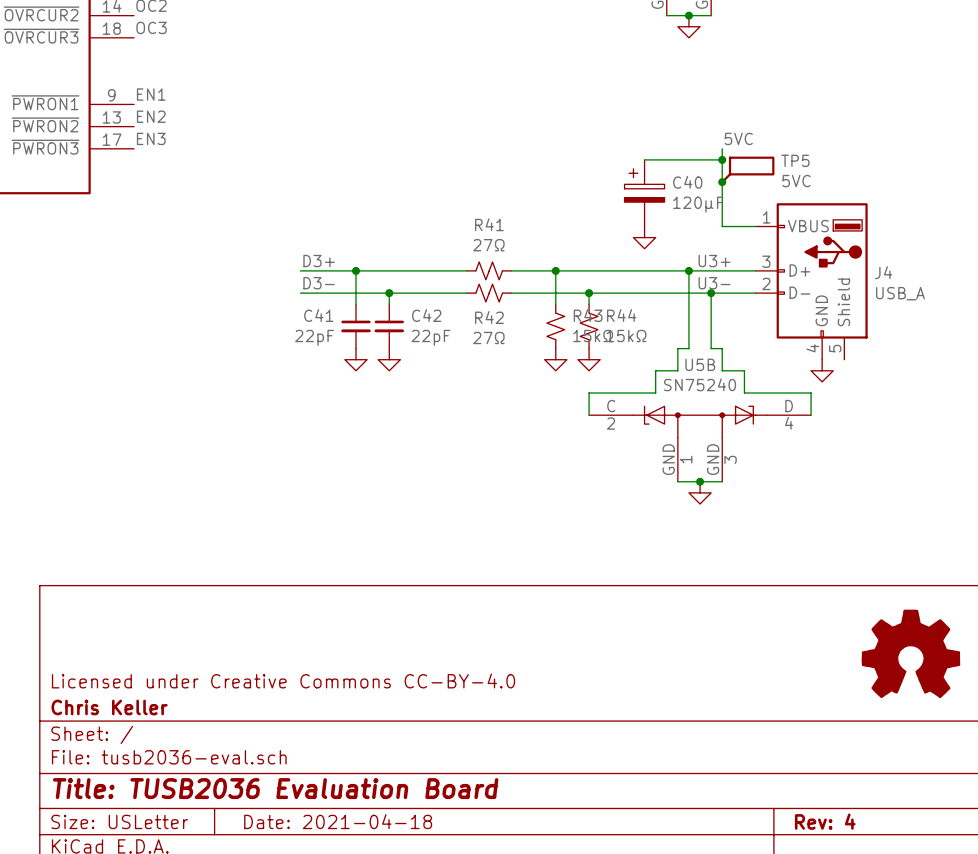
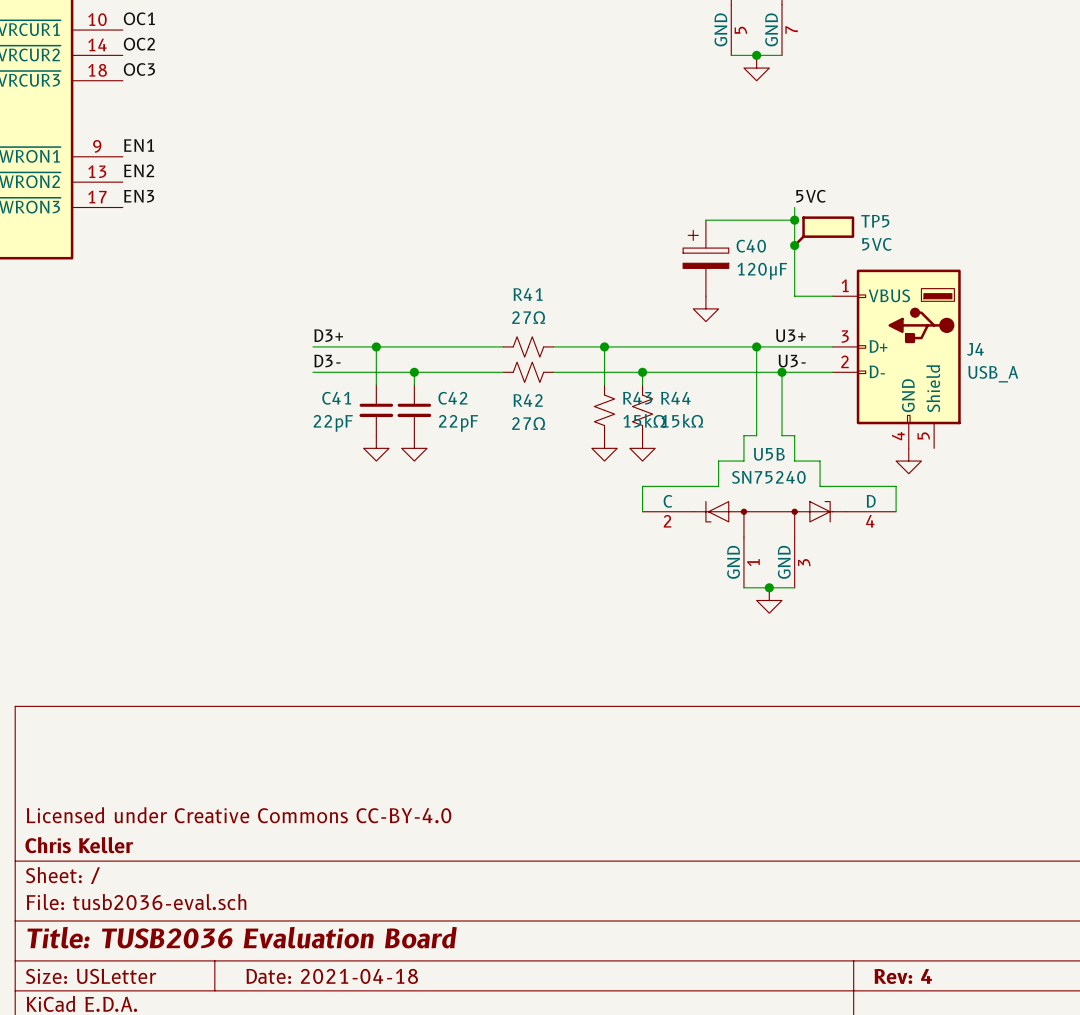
part: (910, 653) -> none

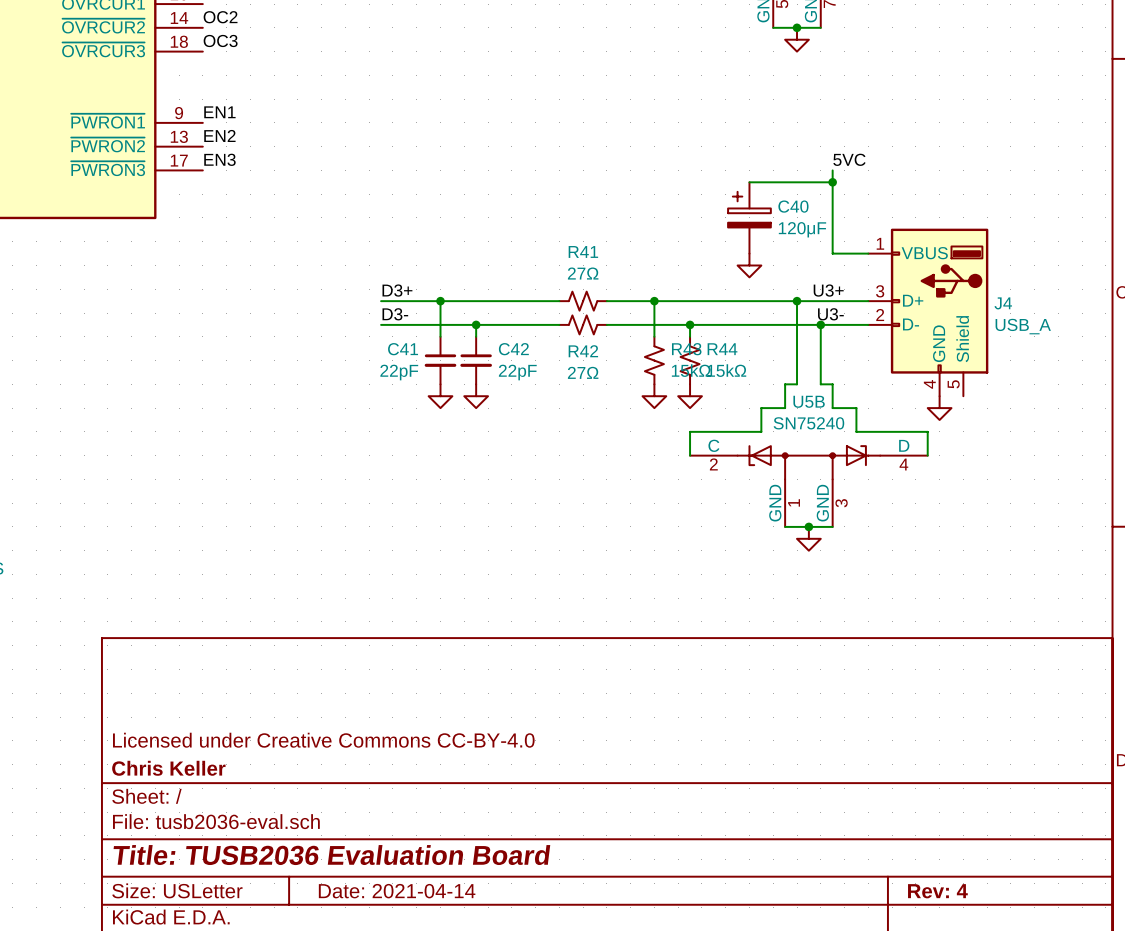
TP5: 5VC (823, 231) -> none
junction: (794, 245) -> none
title block: Date: 2021-04-18 (332, 976) -> Date: 2021-04-14 (397, 891)

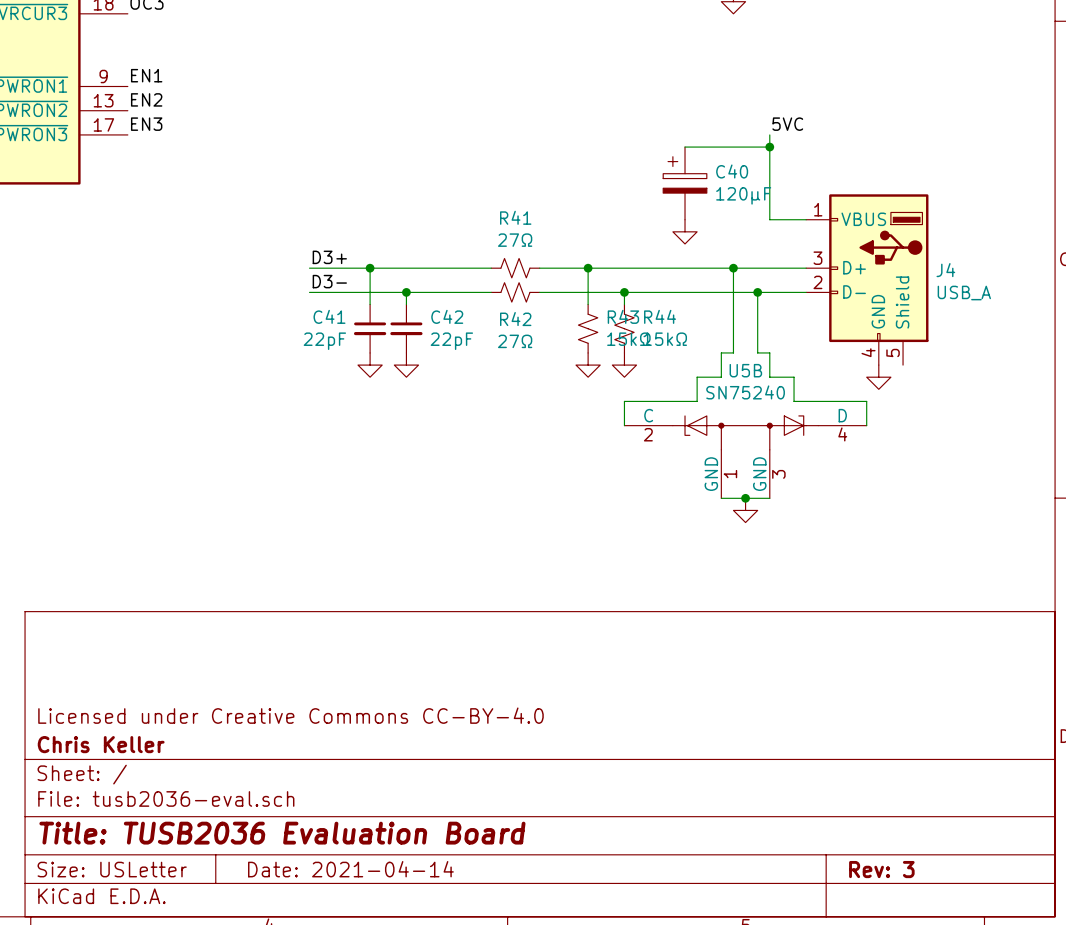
label: U3+ (828, 290) -> none
label: U3- (830, 314) -> none
title block: Rev: 4 (937, 891) -> Rev: 3 (881, 869)

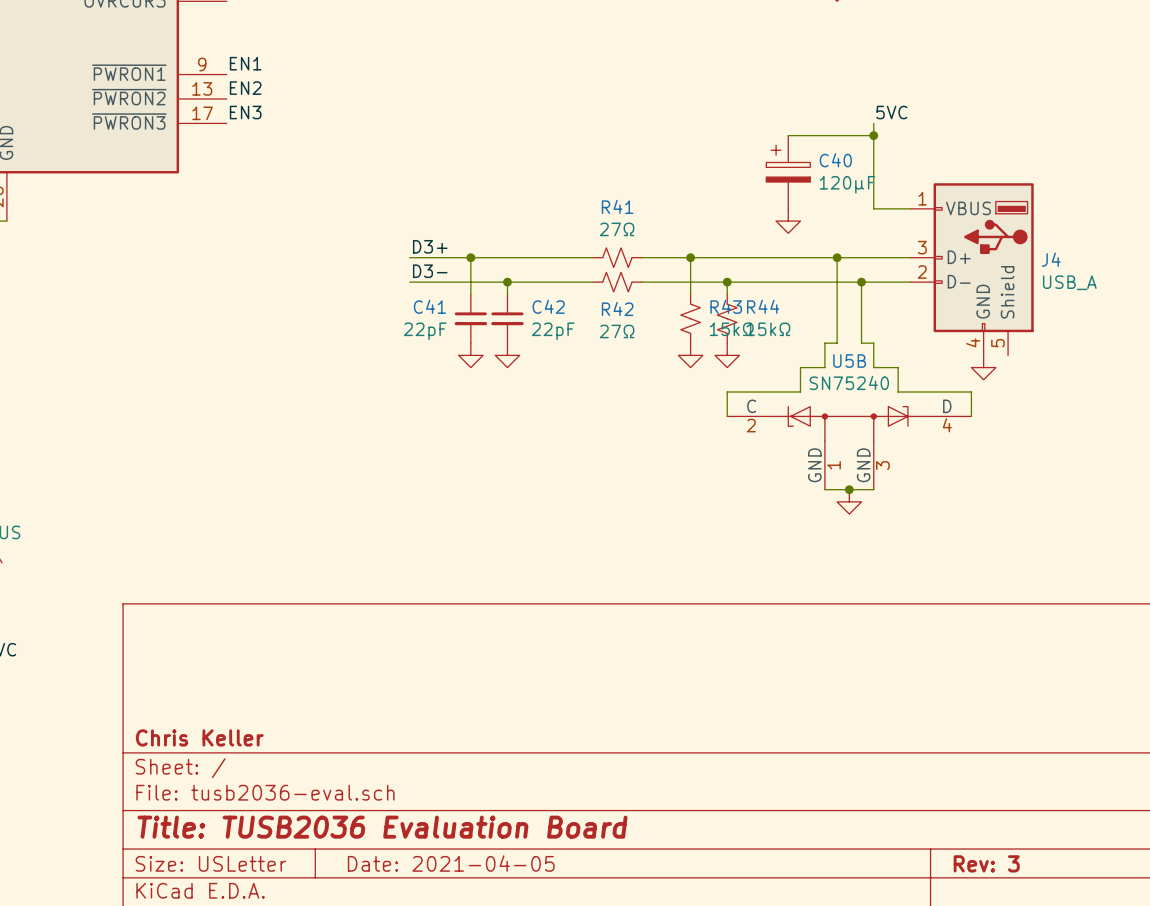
title block: Licensed under Creative Commons CC-BY-4.0 (290, 715) -> none
title block: Date: 2021-04-14 (350, 869) -> Date: 2021-04-05 (451, 863)

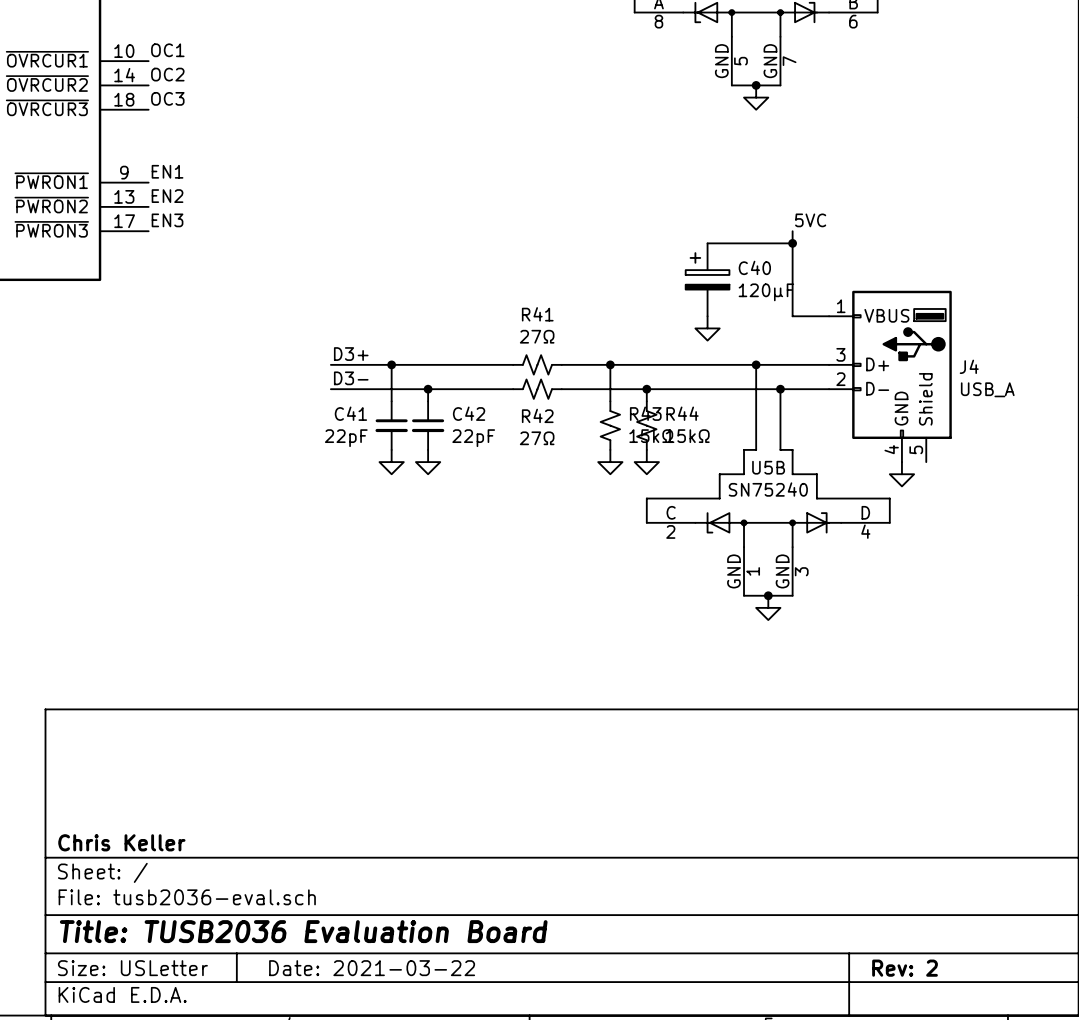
title block: Date: 2021-04-05 (451, 863) -> Date: 2021-03-22 (372, 968)
title block: Rev: 3 (986, 863) -> Rev: 2 (905, 968)

